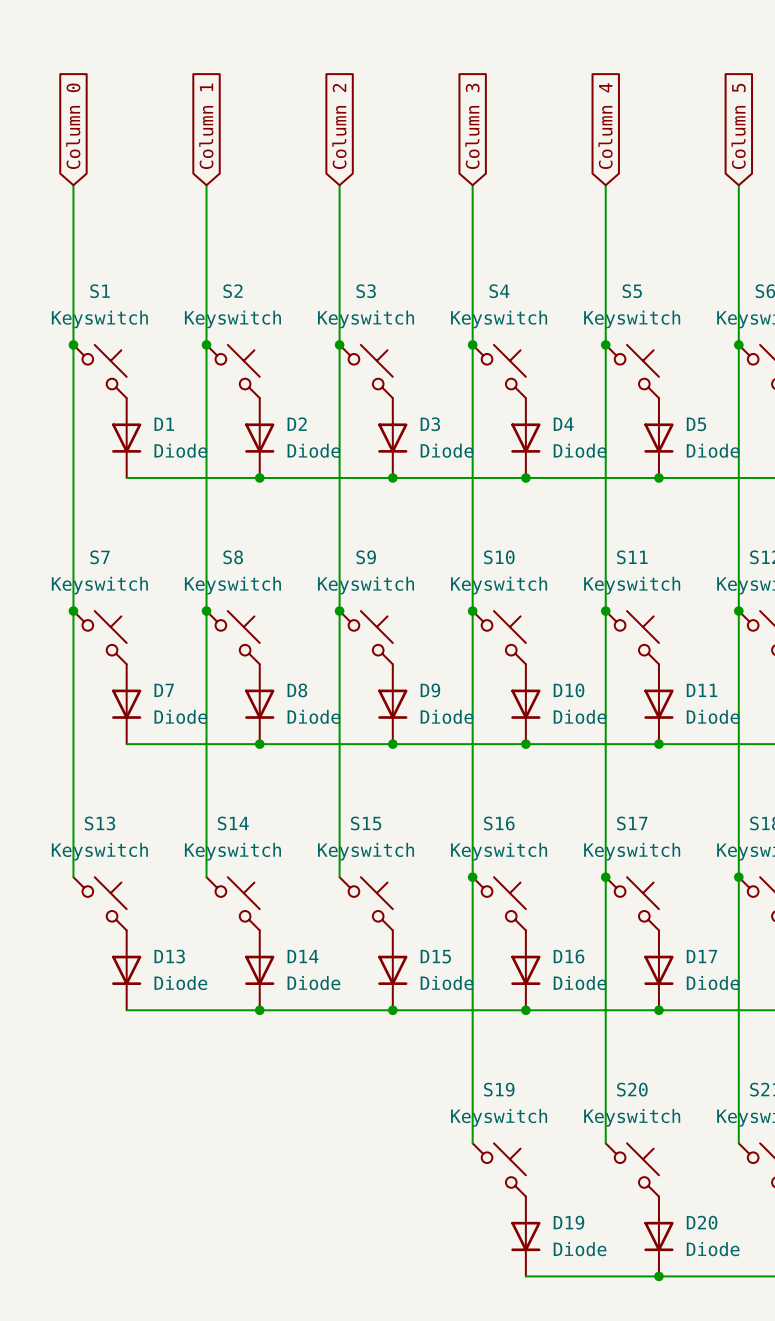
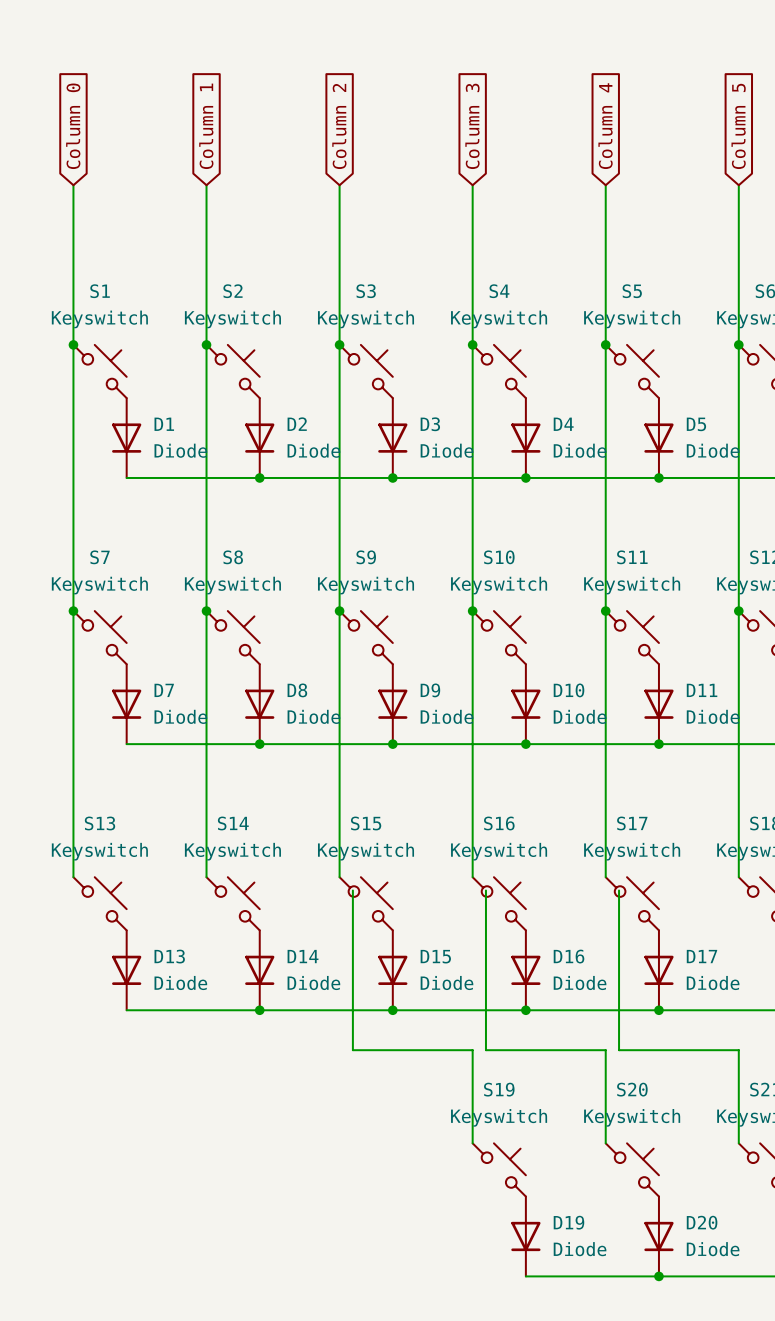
wire: (472, 877) (472, 1050) -> (352, 890) (352, 1050) (472, 1050)
junction: (472, 877) -> none
wire: (605, 877) (605, 1050) -> (485, 890) (485, 1050) (605, 1050)
junction: (605, 877) -> none
wire: (738, 877) (738, 1050) -> (619, 890) (619, 1050) (738, 1050)
junction: (738, 877) -> none

